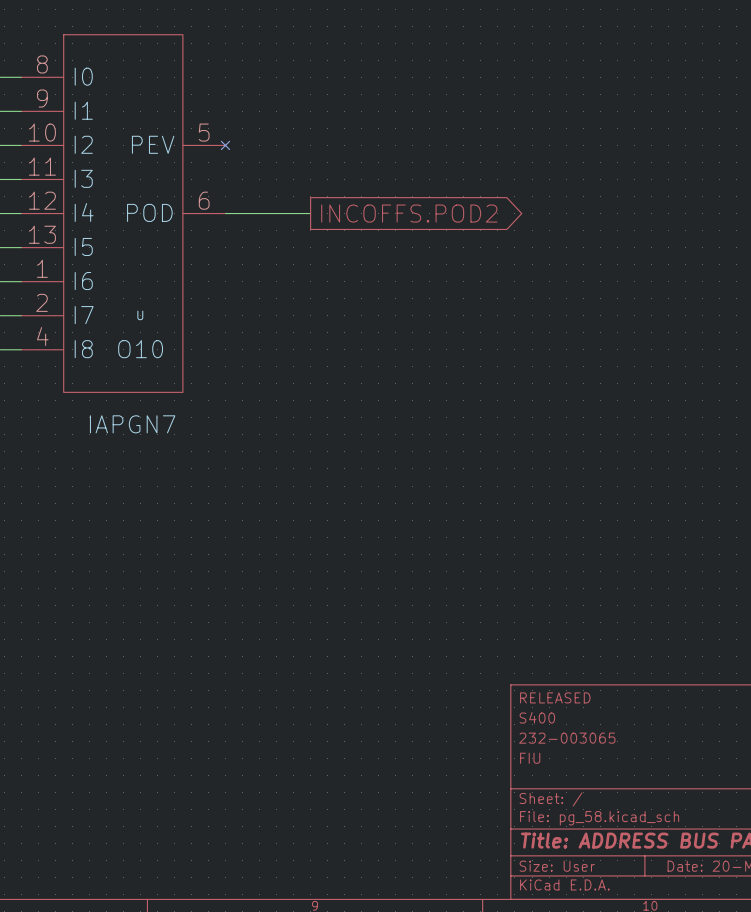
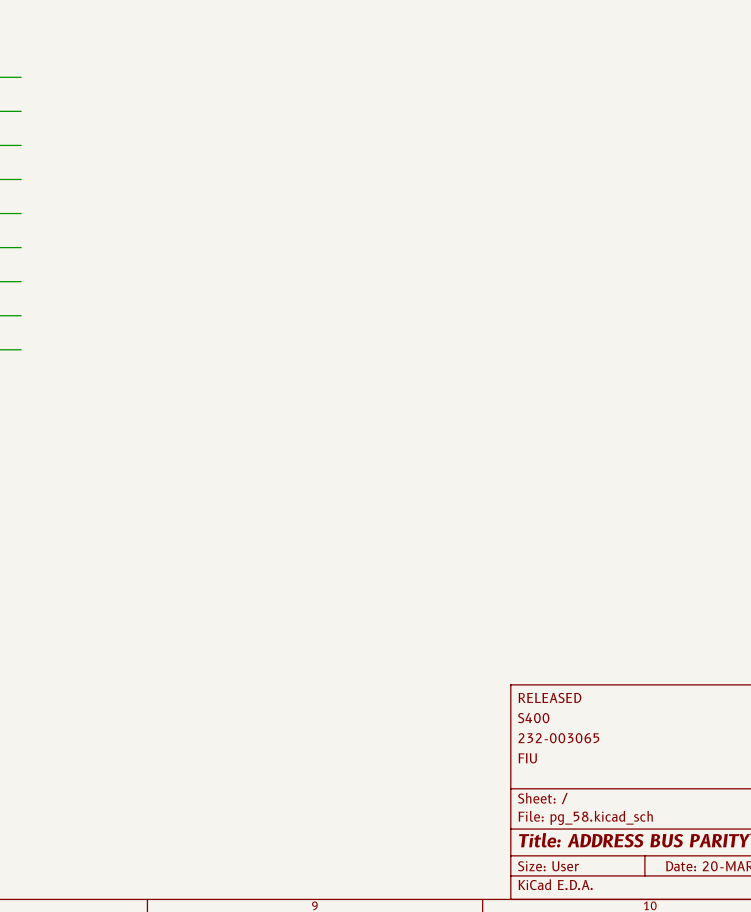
no-connect mark: (225, 145) -> none
U: (123, 213) -> none
wire: (225, 213) (310, 213) -> none
global label: INCOFFS.POD2 (409, 213) -> none

